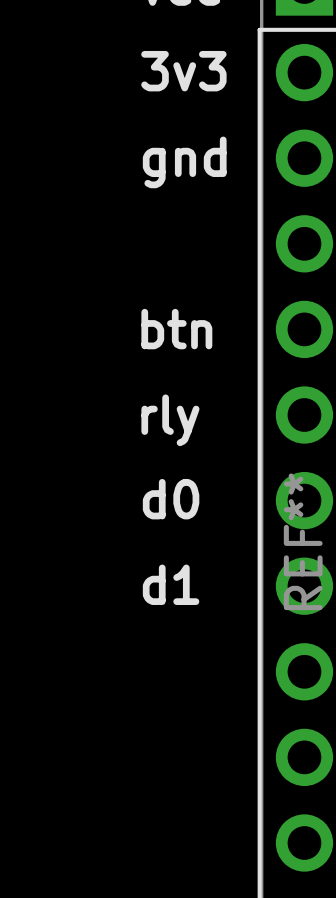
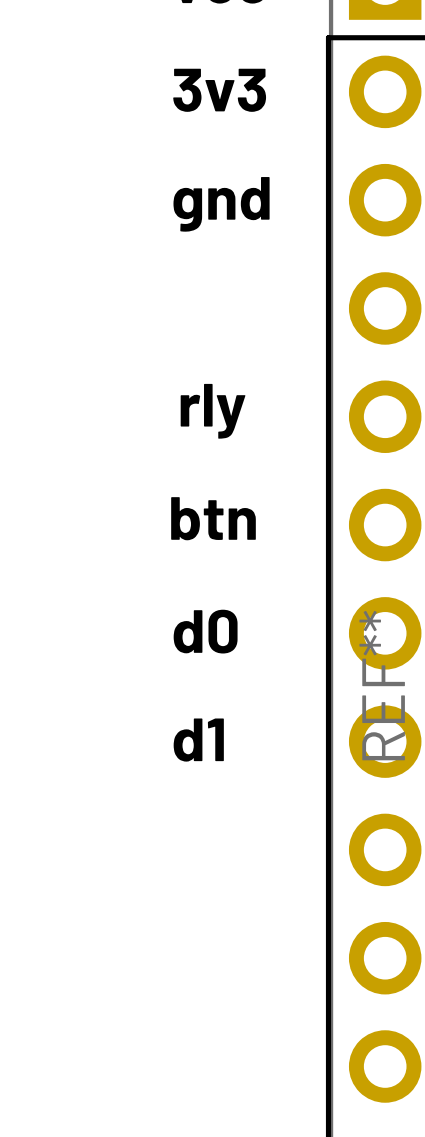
text position: btn (176, 329) -> btn (213, 518)
text position: rly (170, 420) -> rly (213, 411)

